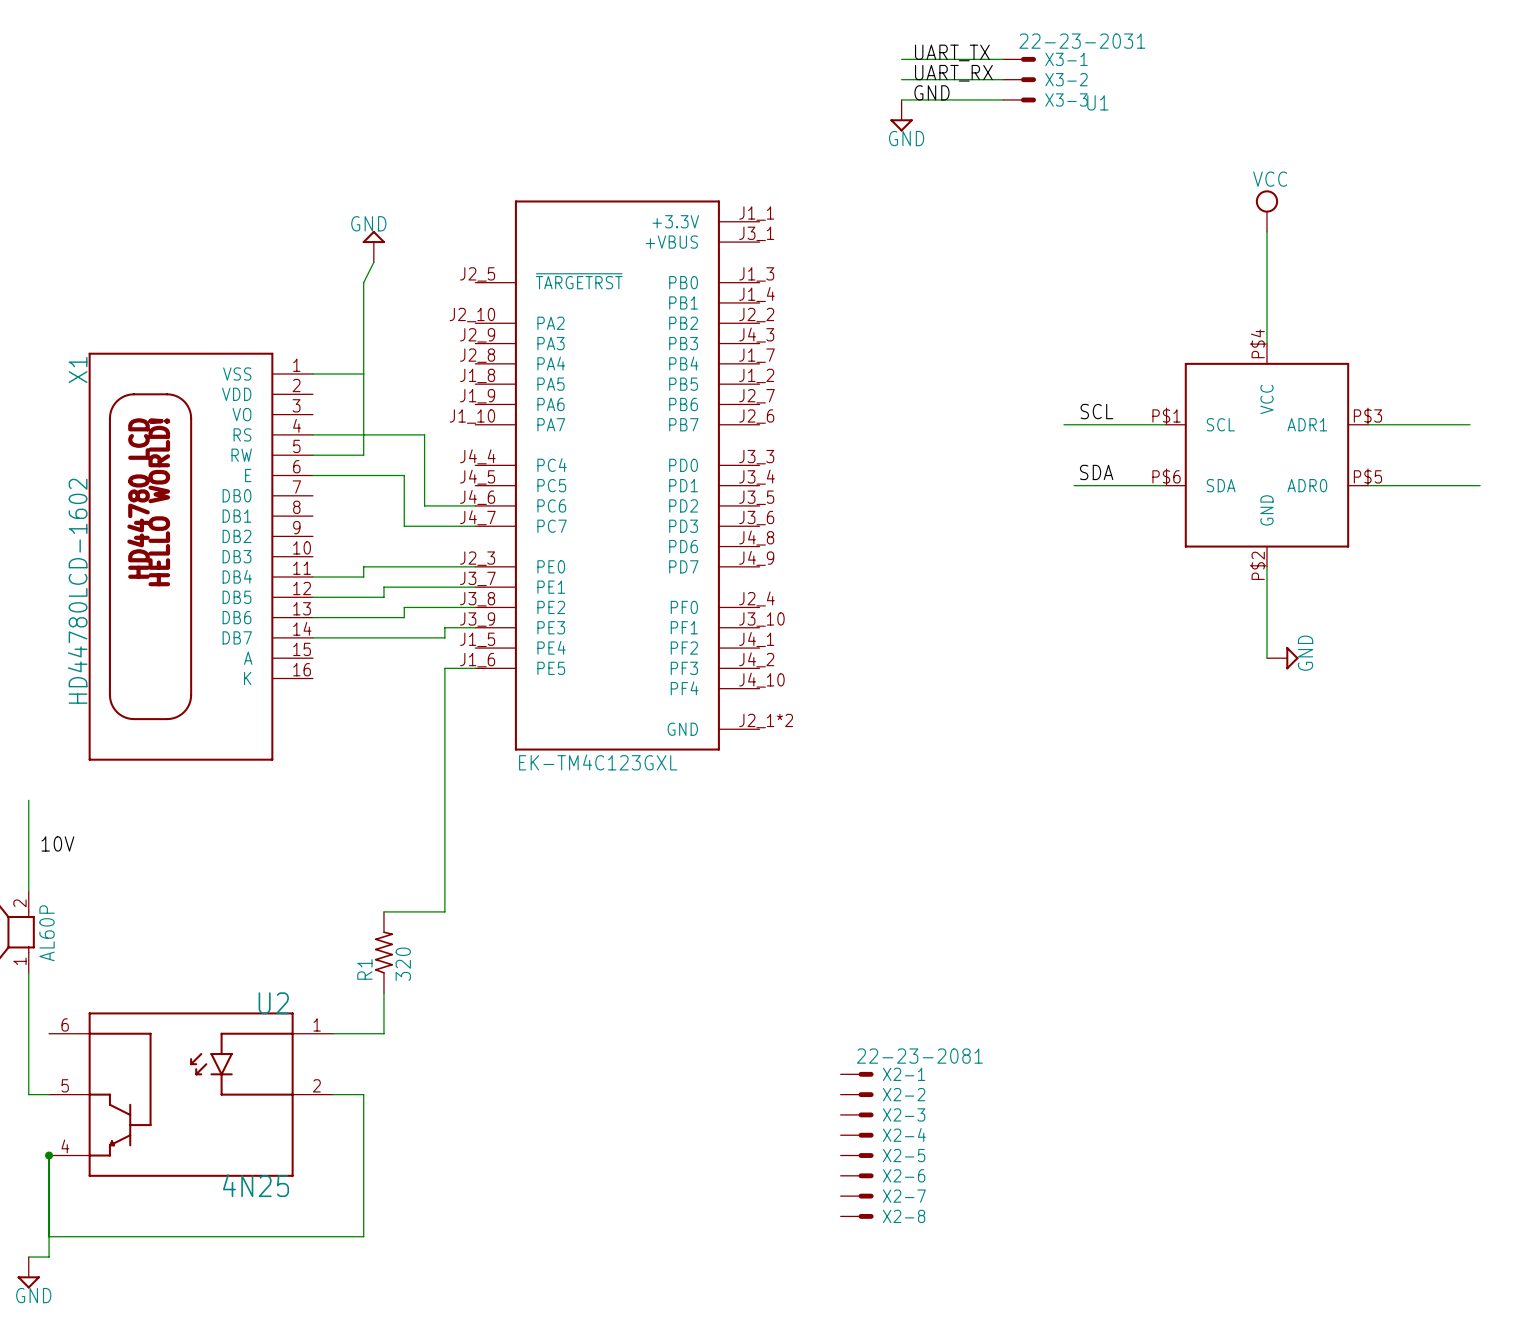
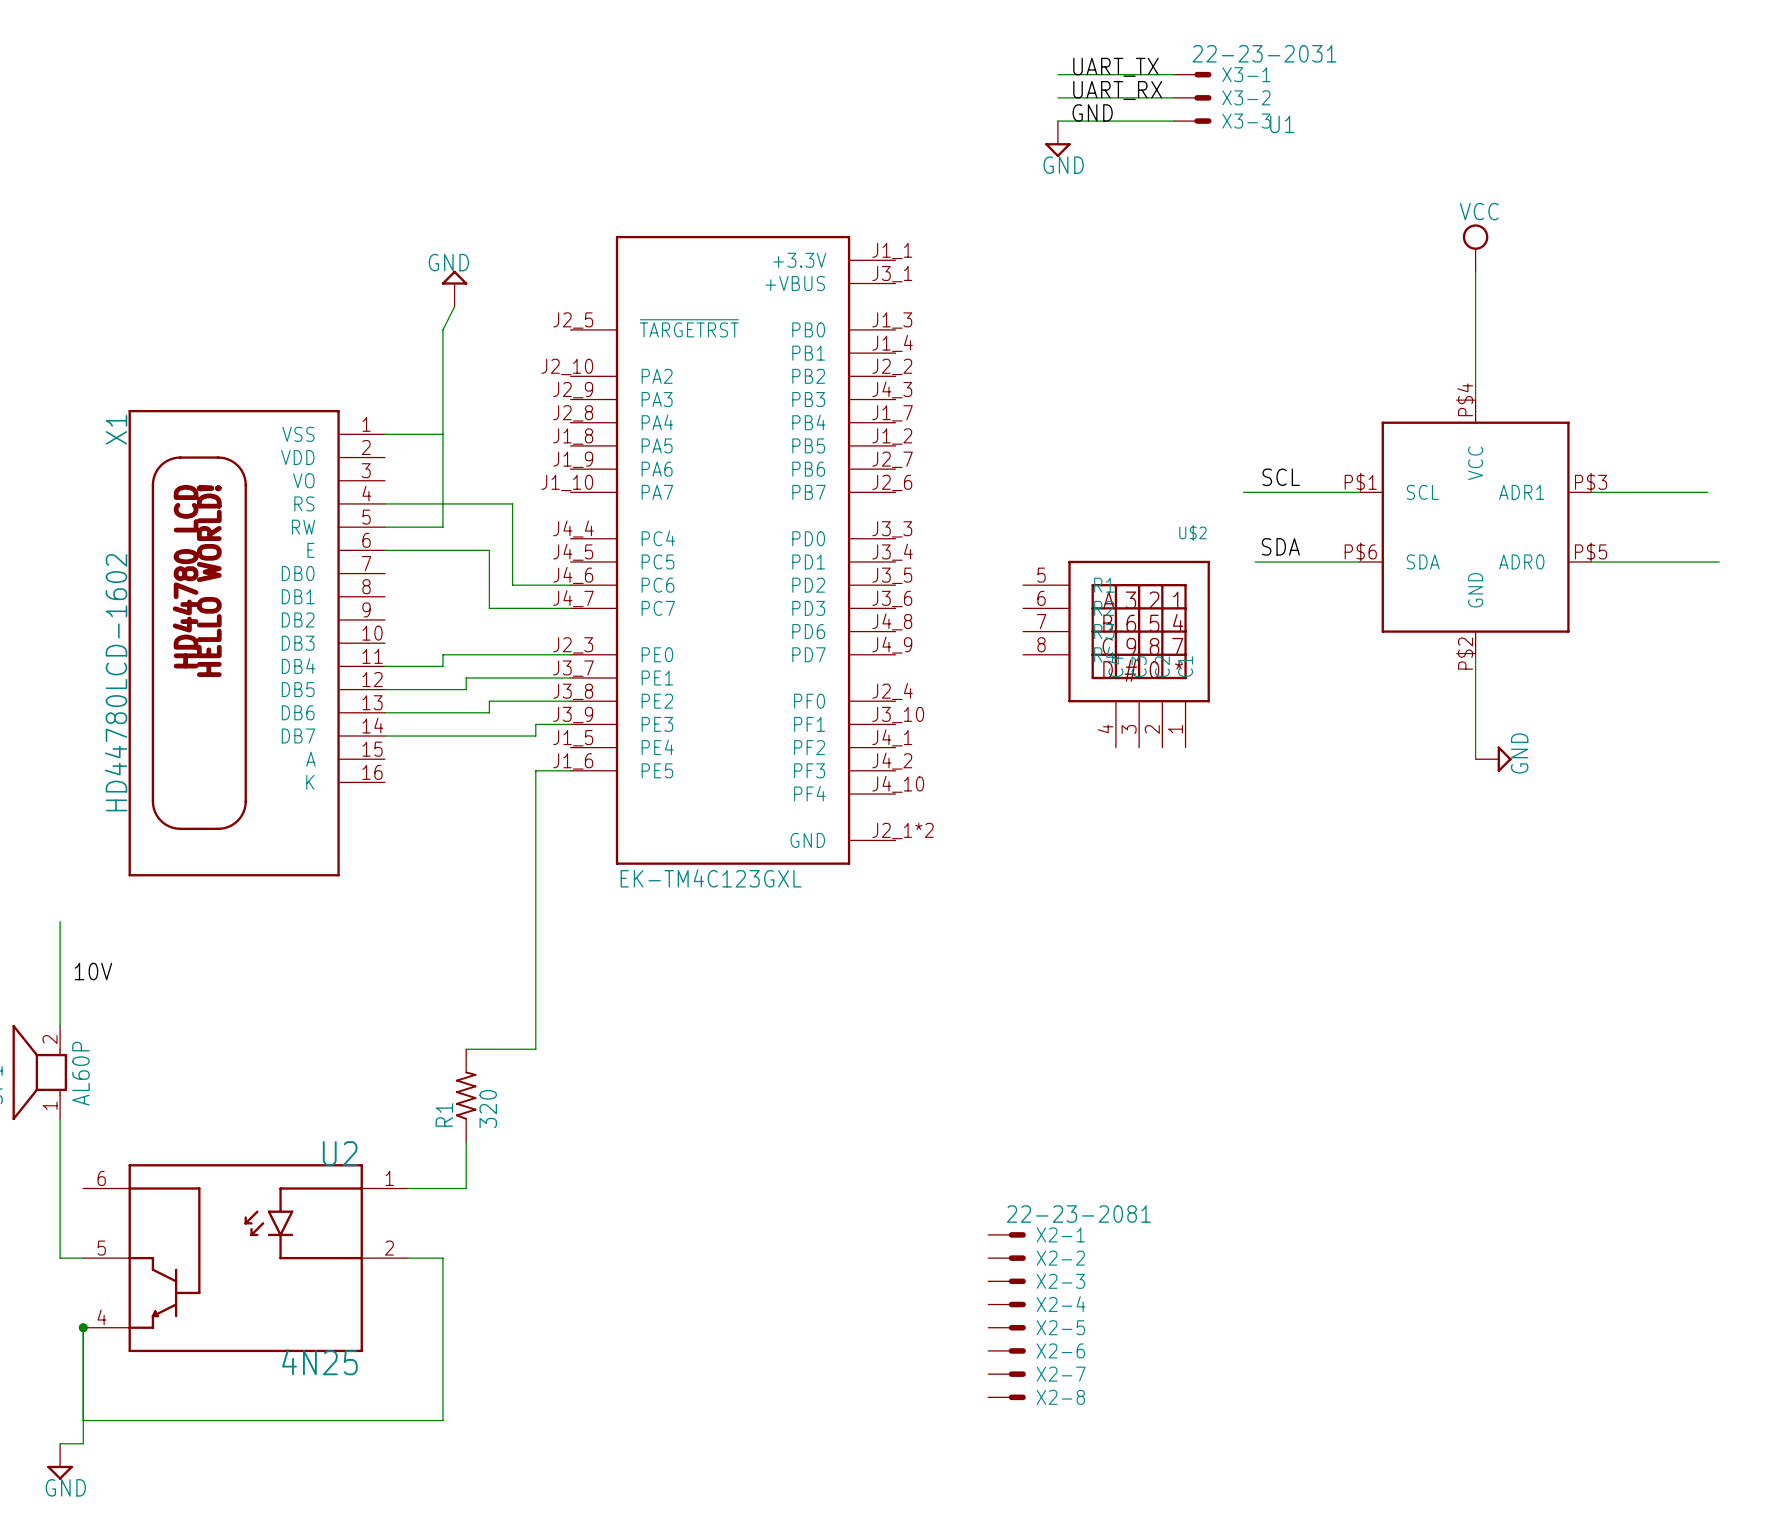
U$2: none -> (1116, 654)

